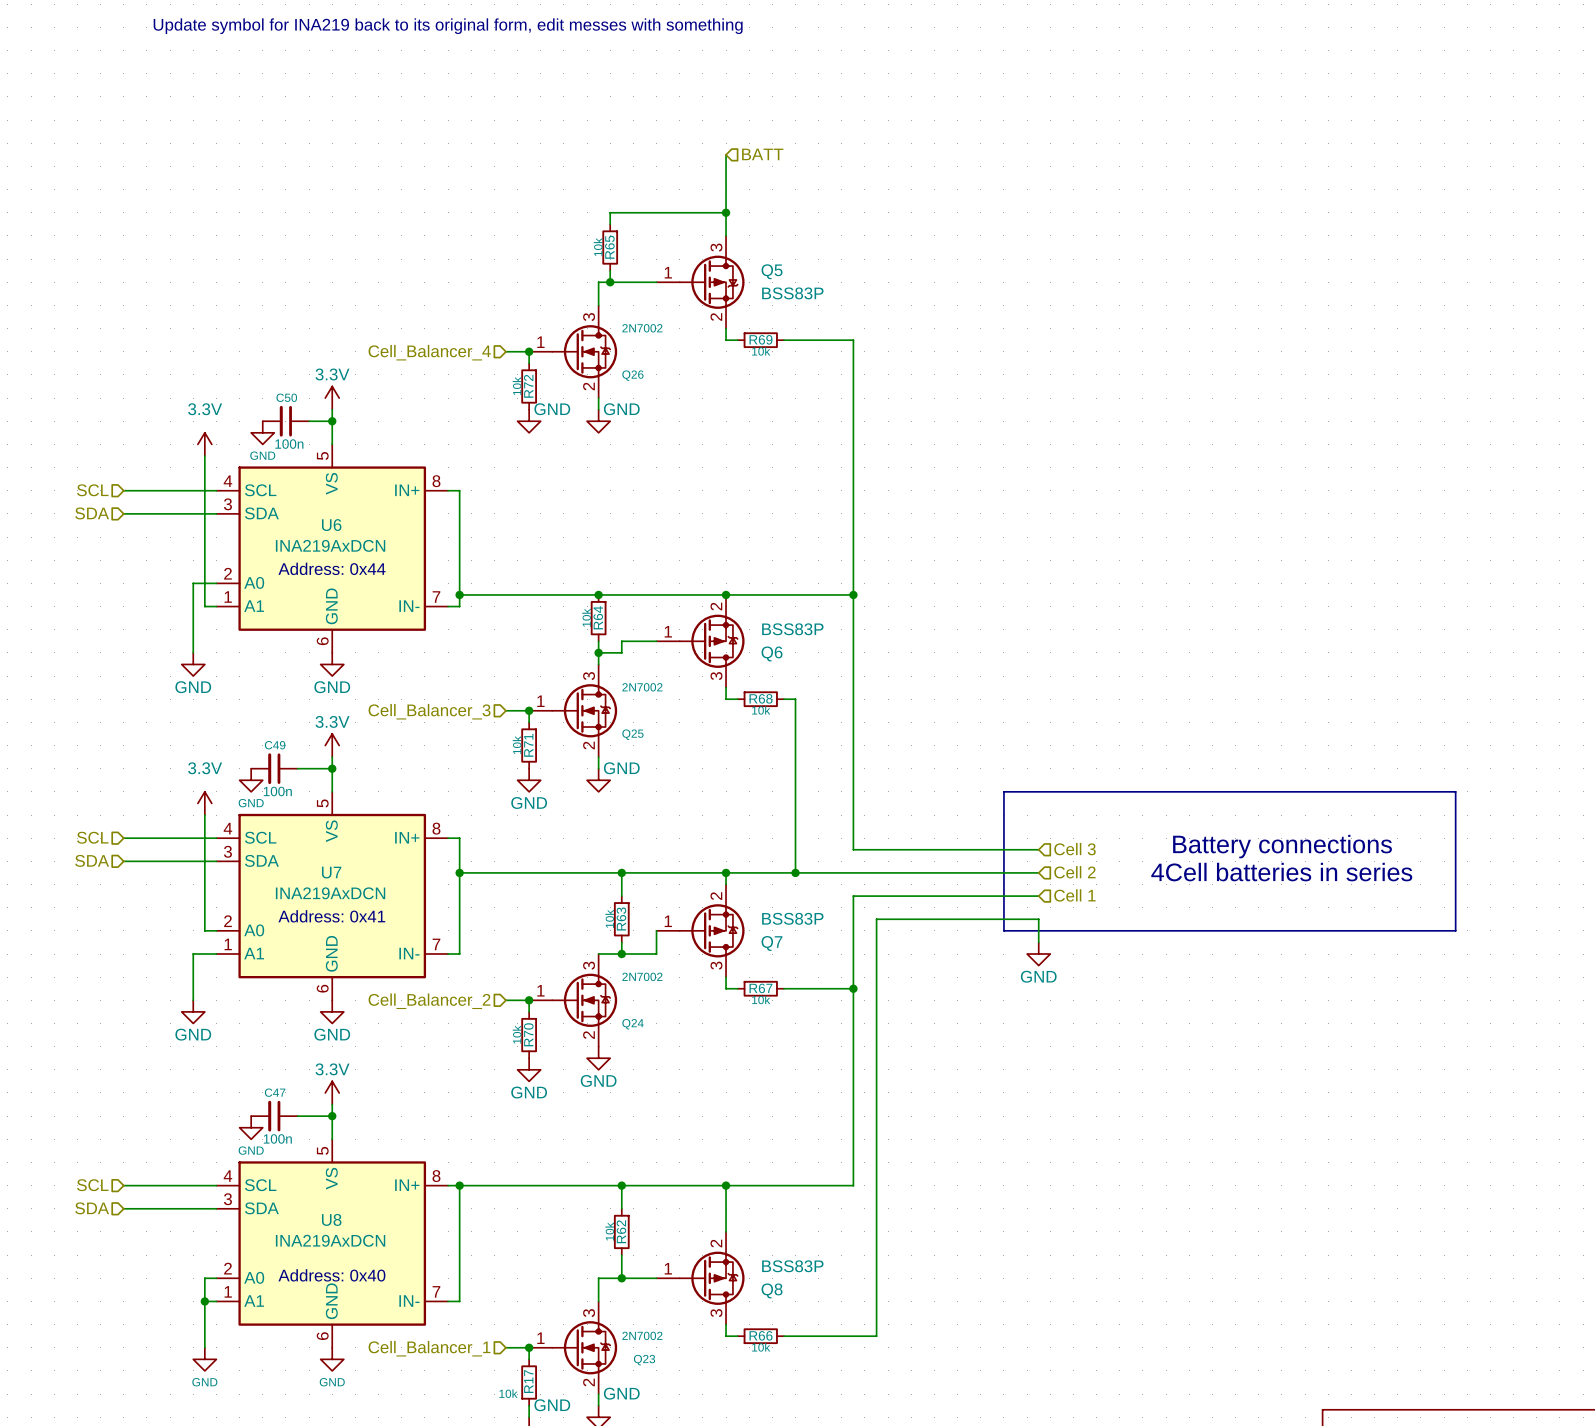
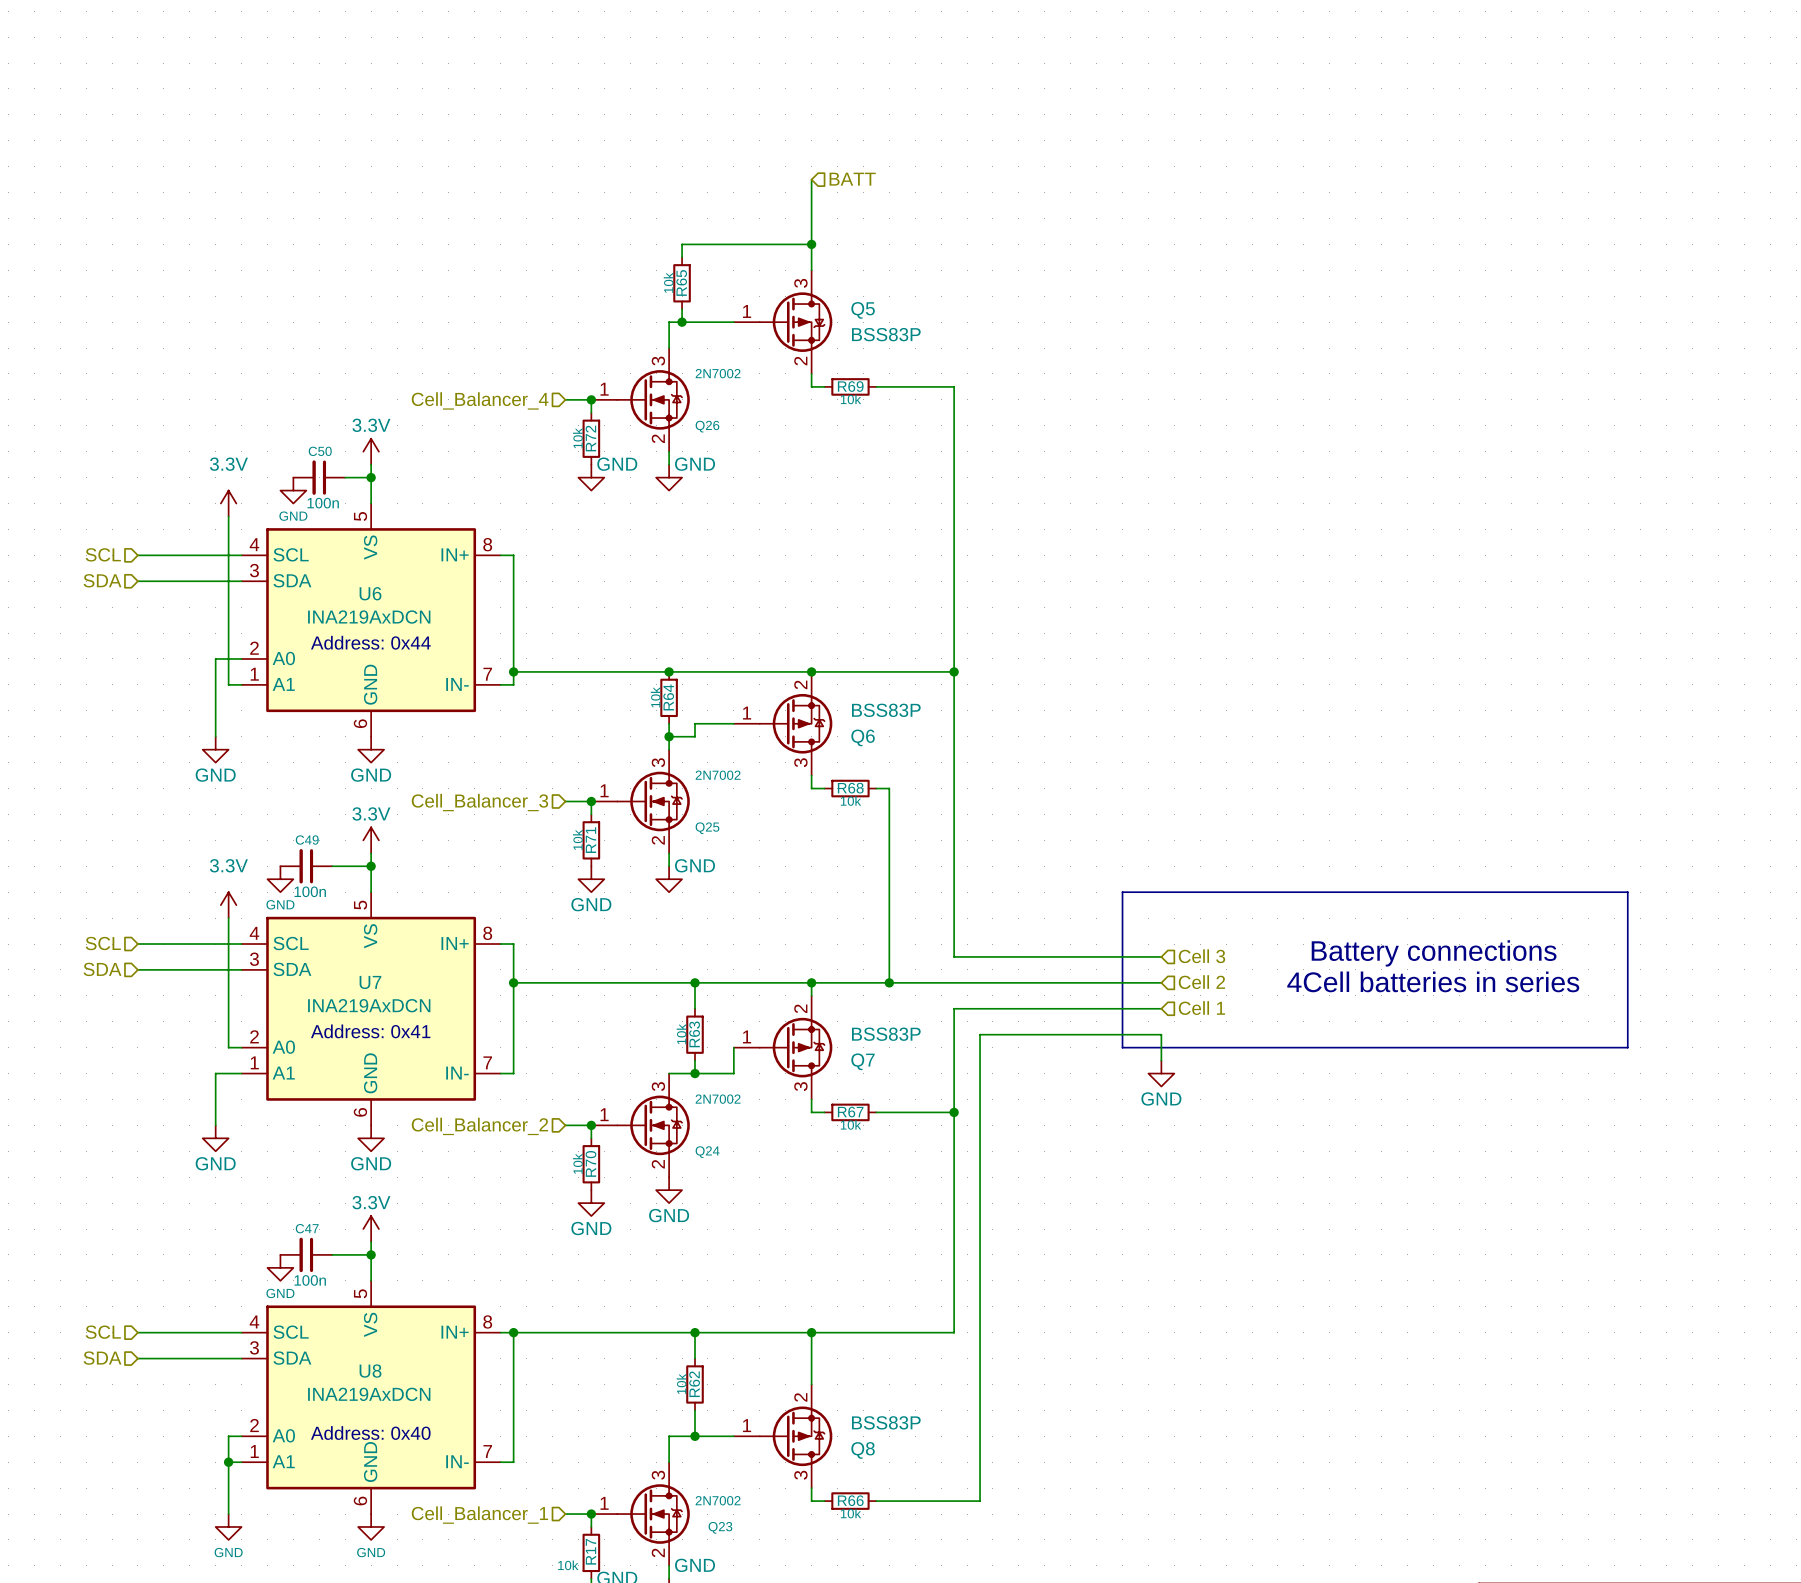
text: Update symbol for INA219 back to its original form, edit messes with something (448, 26) -> none

